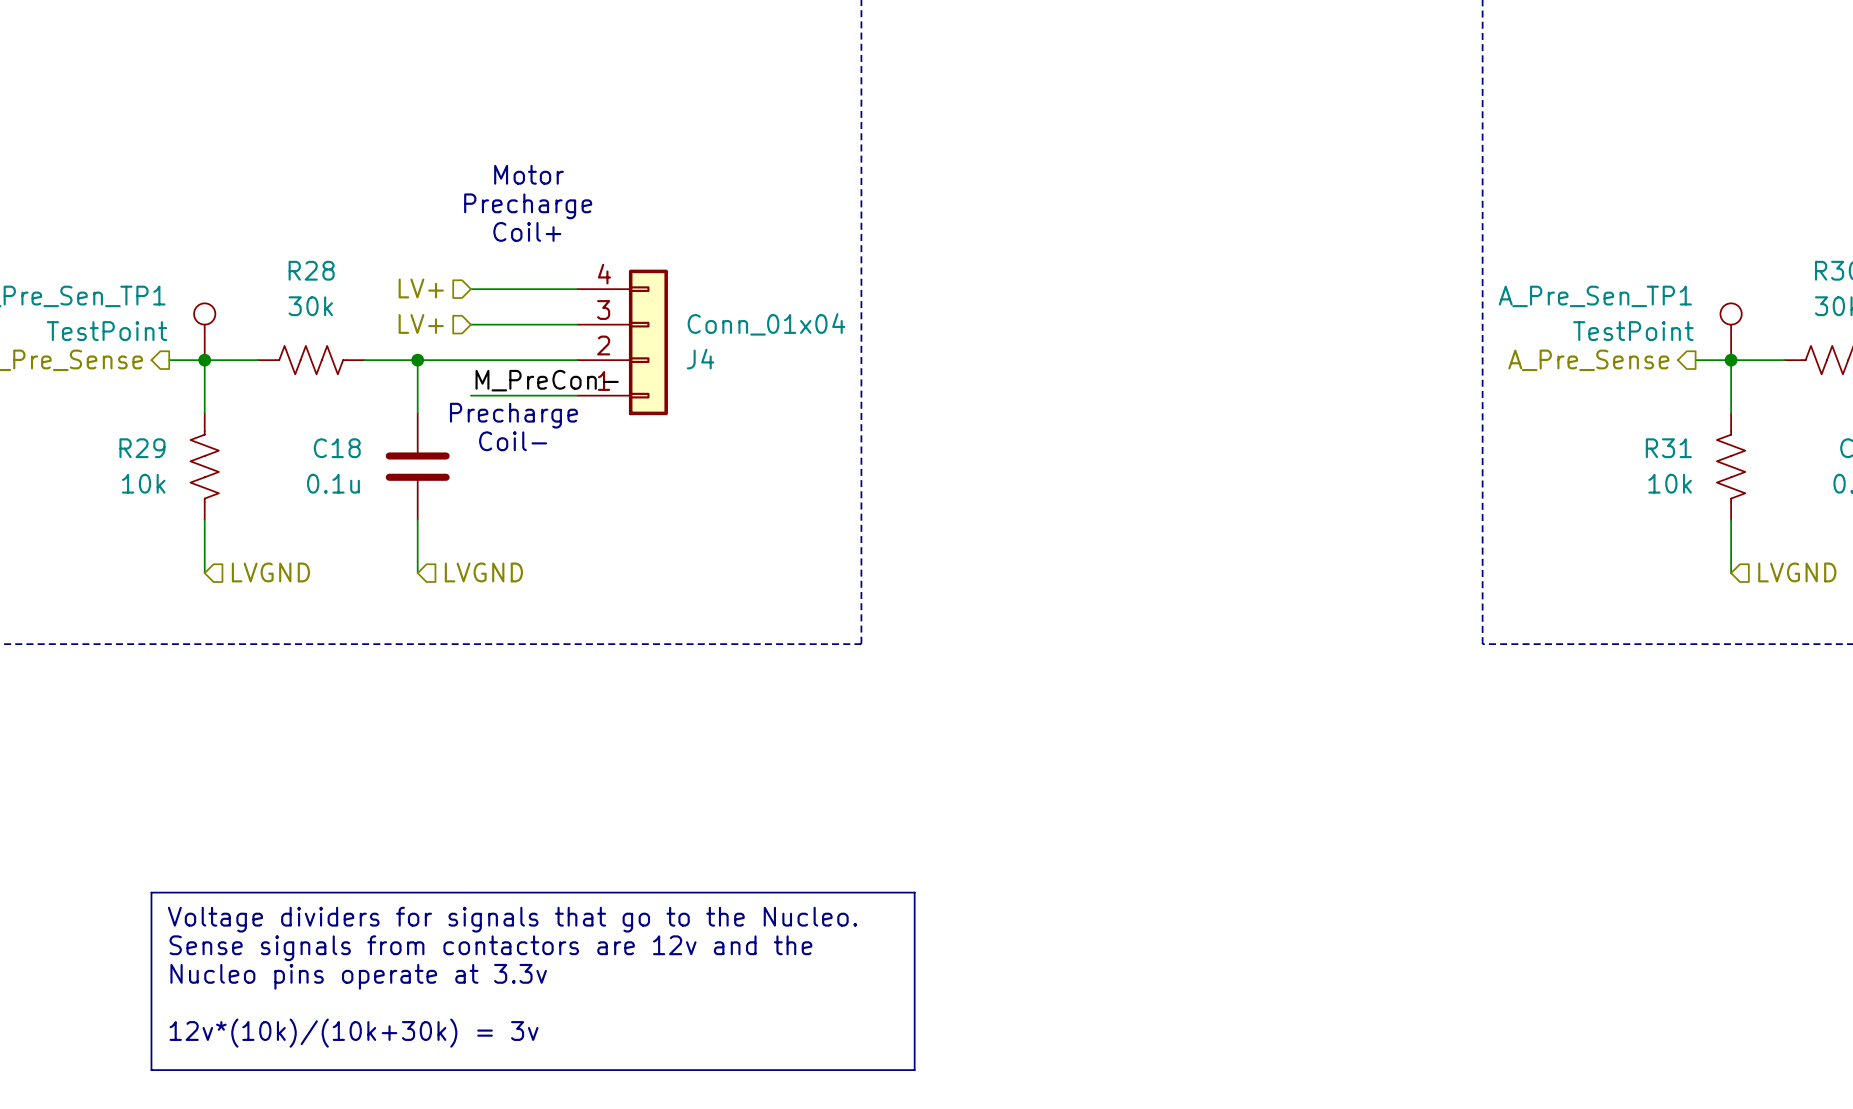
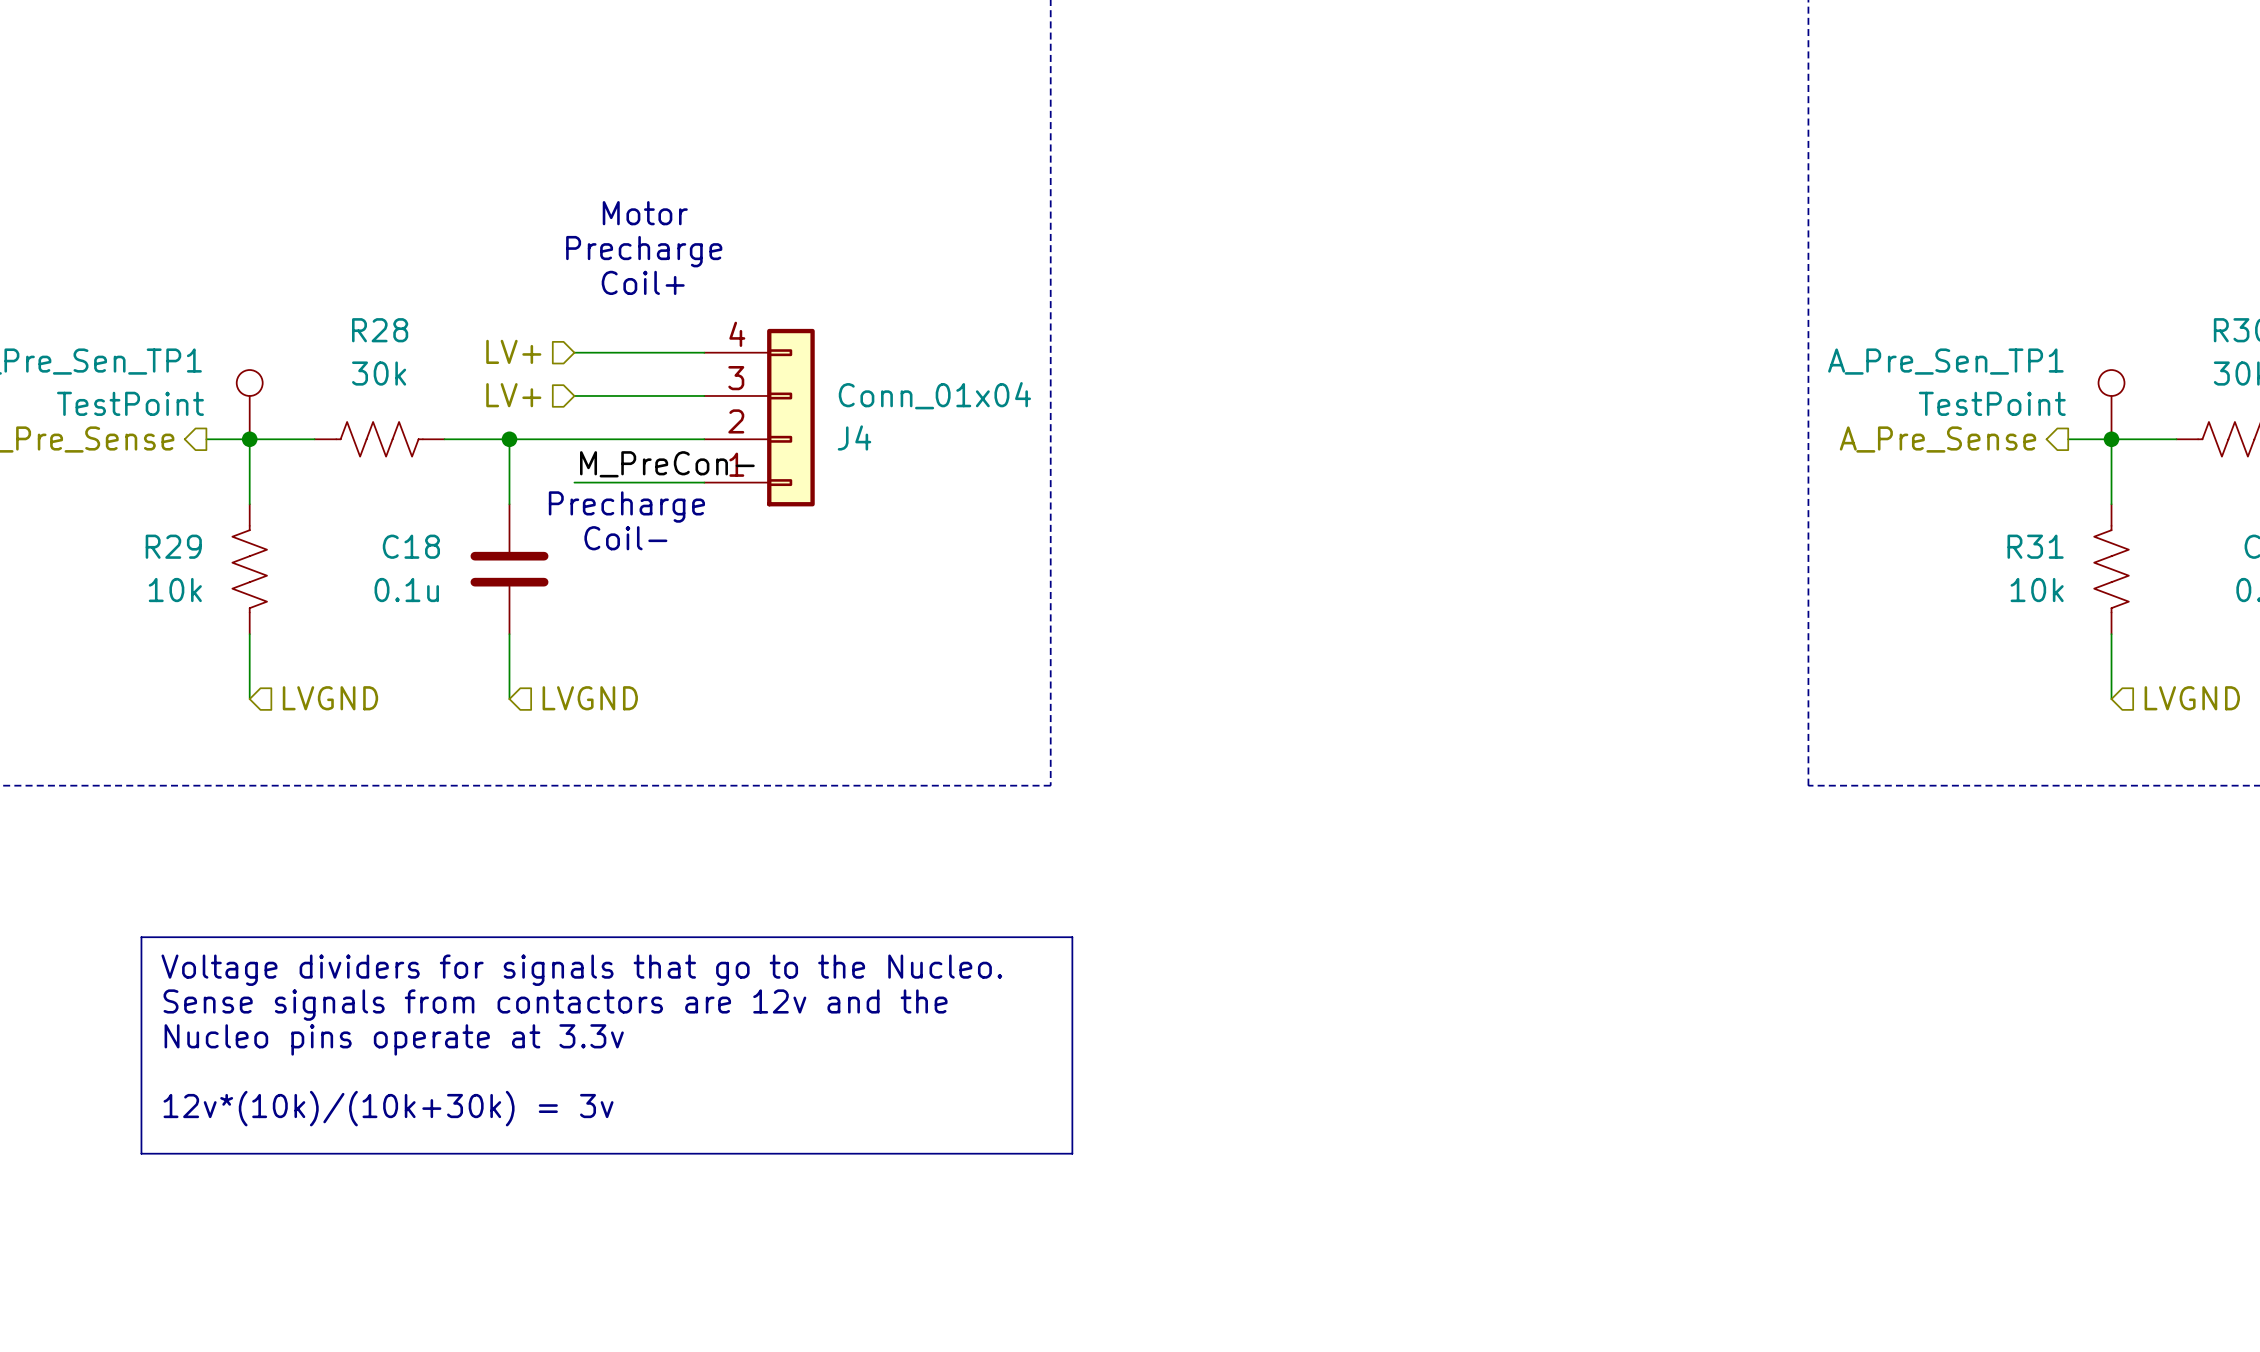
line: (151, 892) (914, 892) (914, 1070) (151, 1070) (151, 892) -> (141, 937) (1072, 937) (1072, 1153) (141, 1153) (141, 937)
text position: Voltage dividers for signals that go to the Nucleo. (512, 919) -> Voltage dividers for signals that go to the Nucleo. (581, 970)
text position: Sense signals from contactors are 12v and the (490, 948) -> Sense signals from contactors are 12v and the (555, 1005)
text position: Nucleo pins operate at 3.3v (358, 976) -> Nucleo pins operate at 3.3v (394, 1039)
text position: 12v*(10k)/(10k+30k) = 3v (354, 1033) -> 12v*(10k)/(10k+30k) = 3v (388, 1108)

